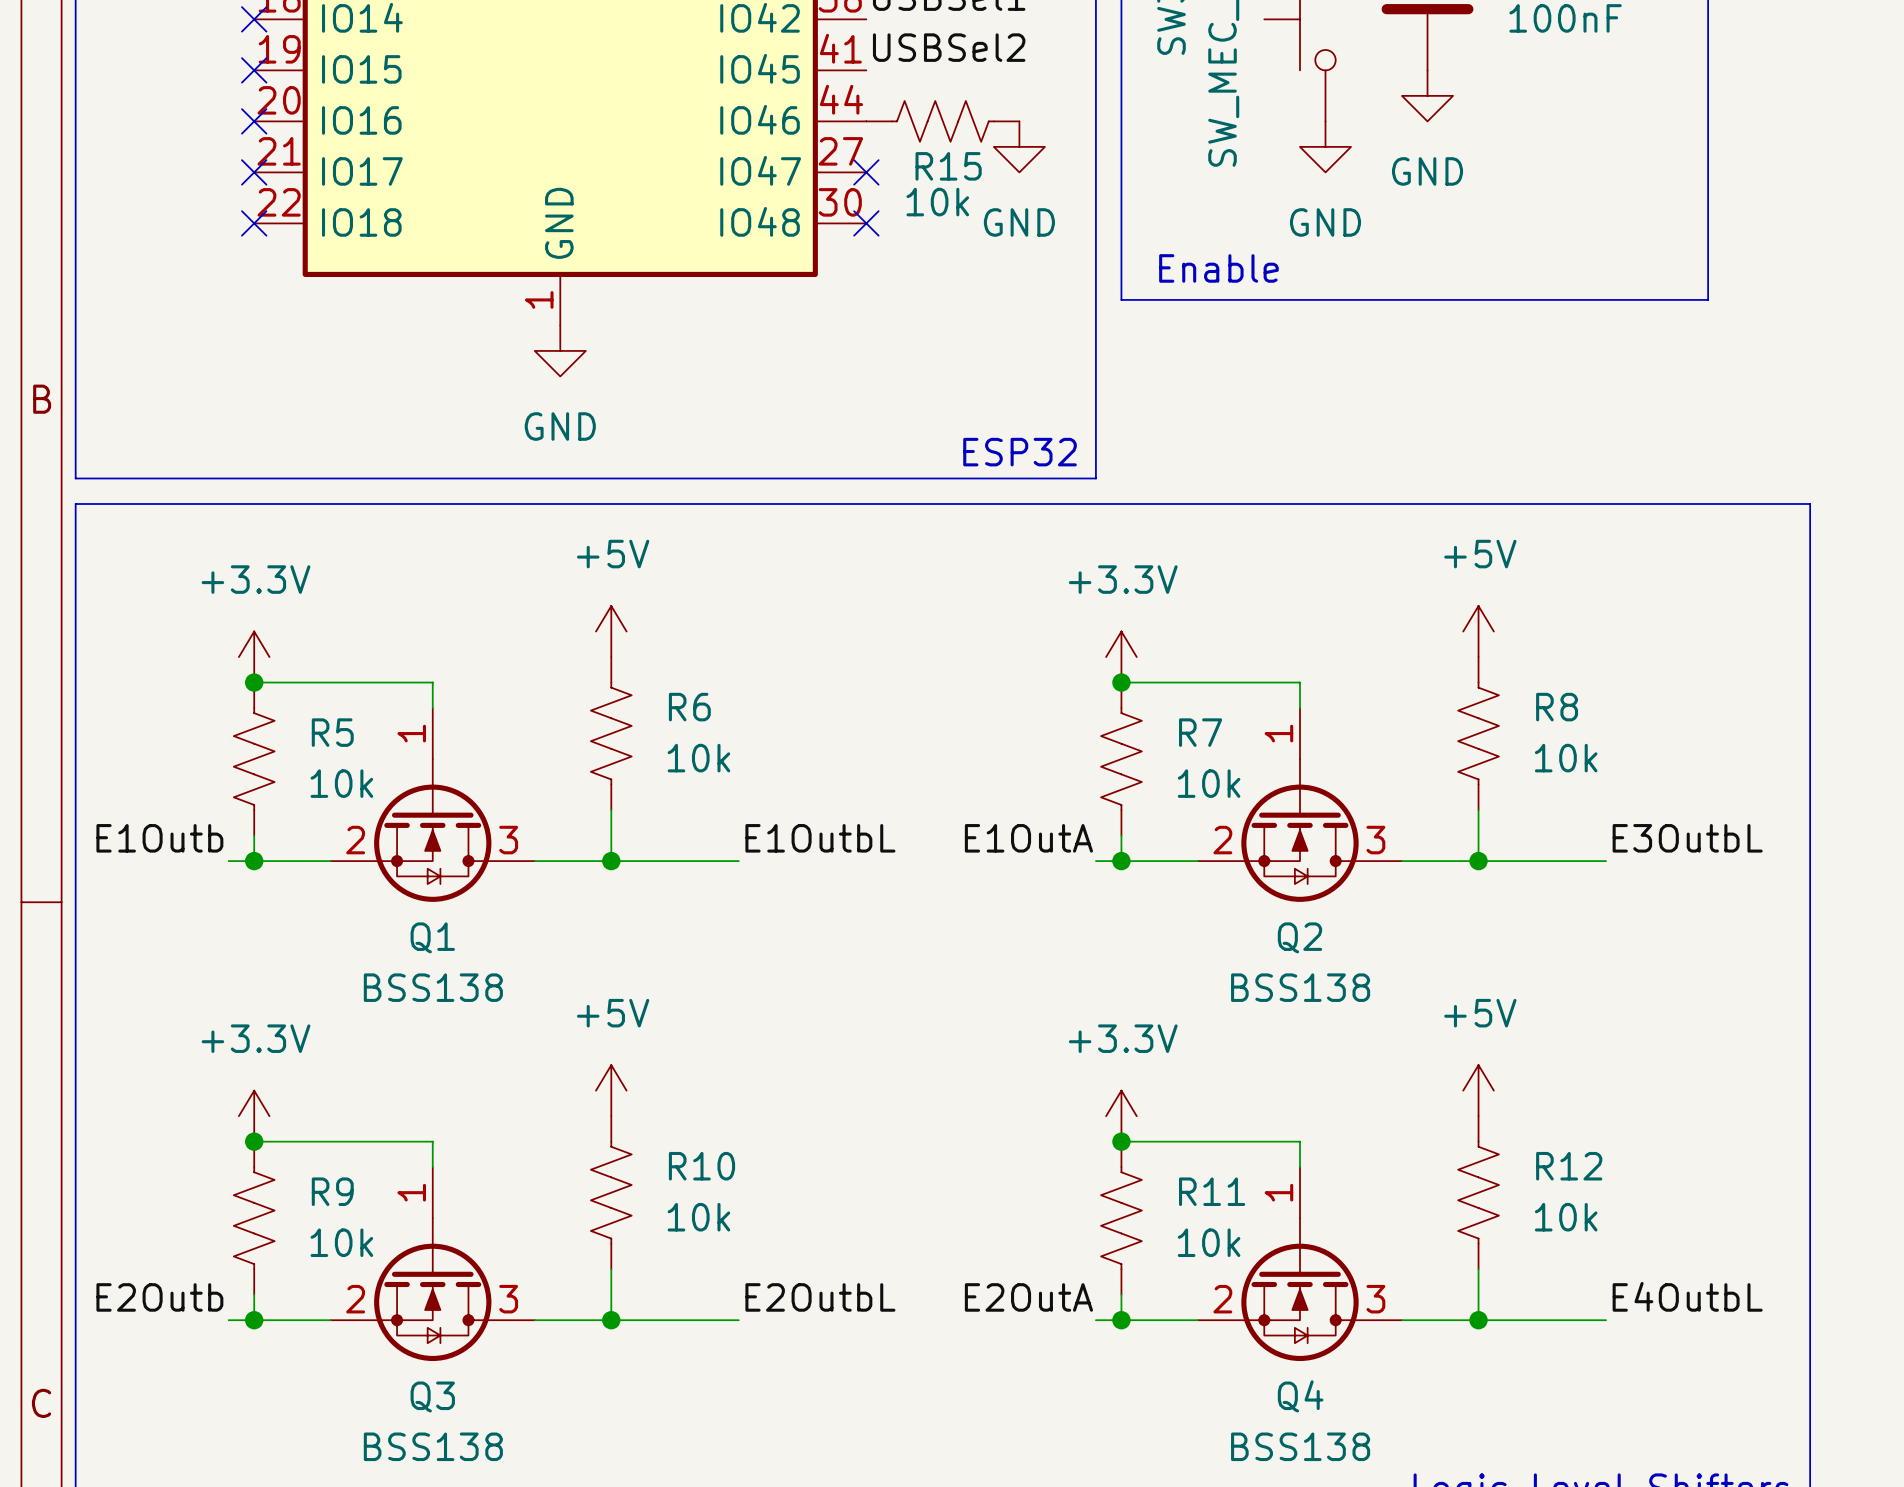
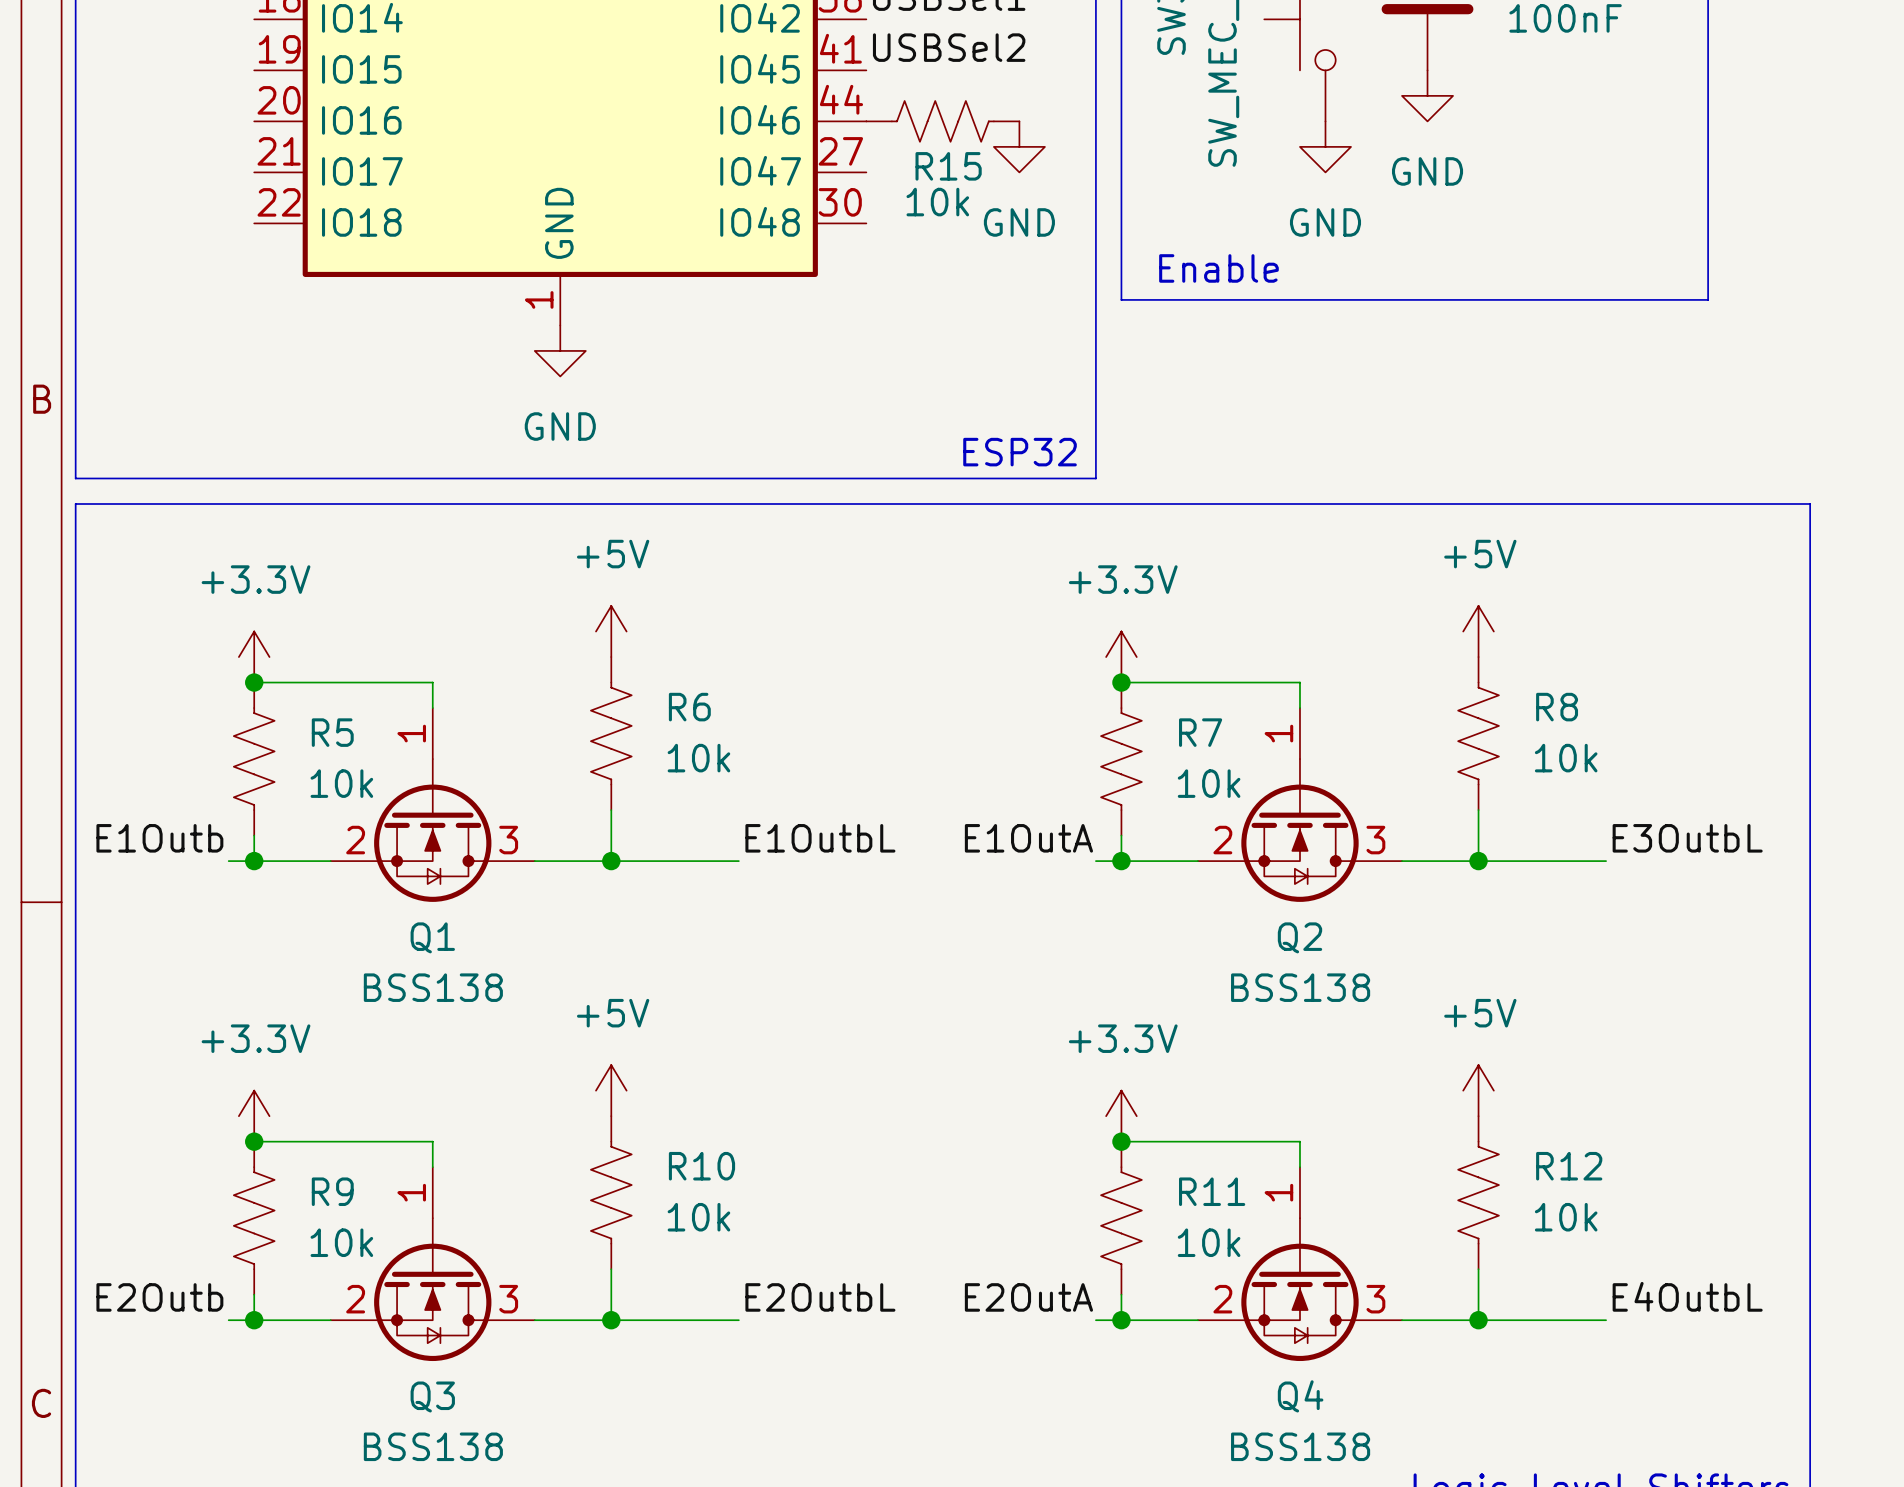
no-connect mark: (254, 19) -> none
no-connect mark: (254, 70) -> none
no-connect mark: (254, 121) -> none
no-connect mark: (254, 172) -> none
no-connect mark: (866, 172) -> none
no-connect mark: (254, 223) -> none
no-connect mark: (866, 223) -> none

